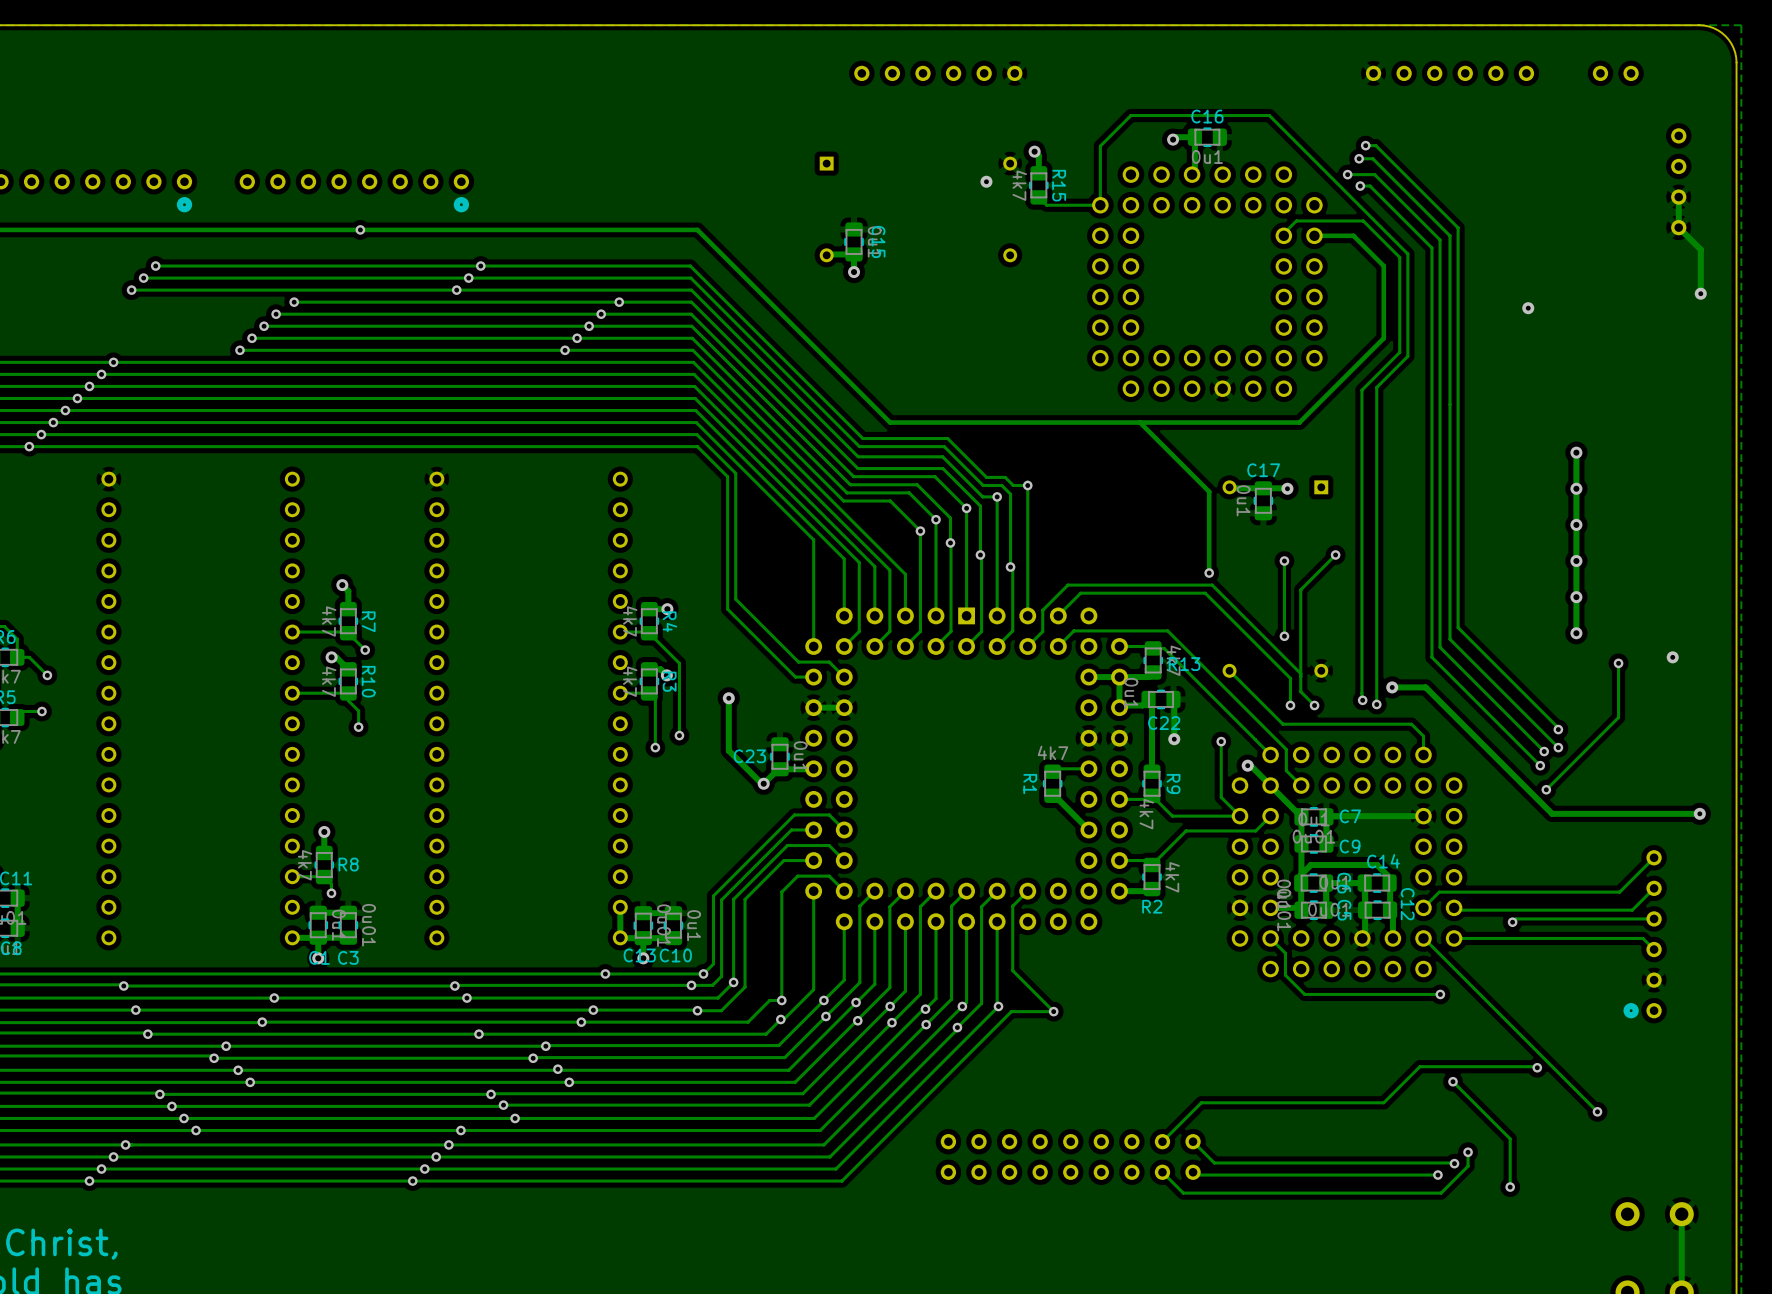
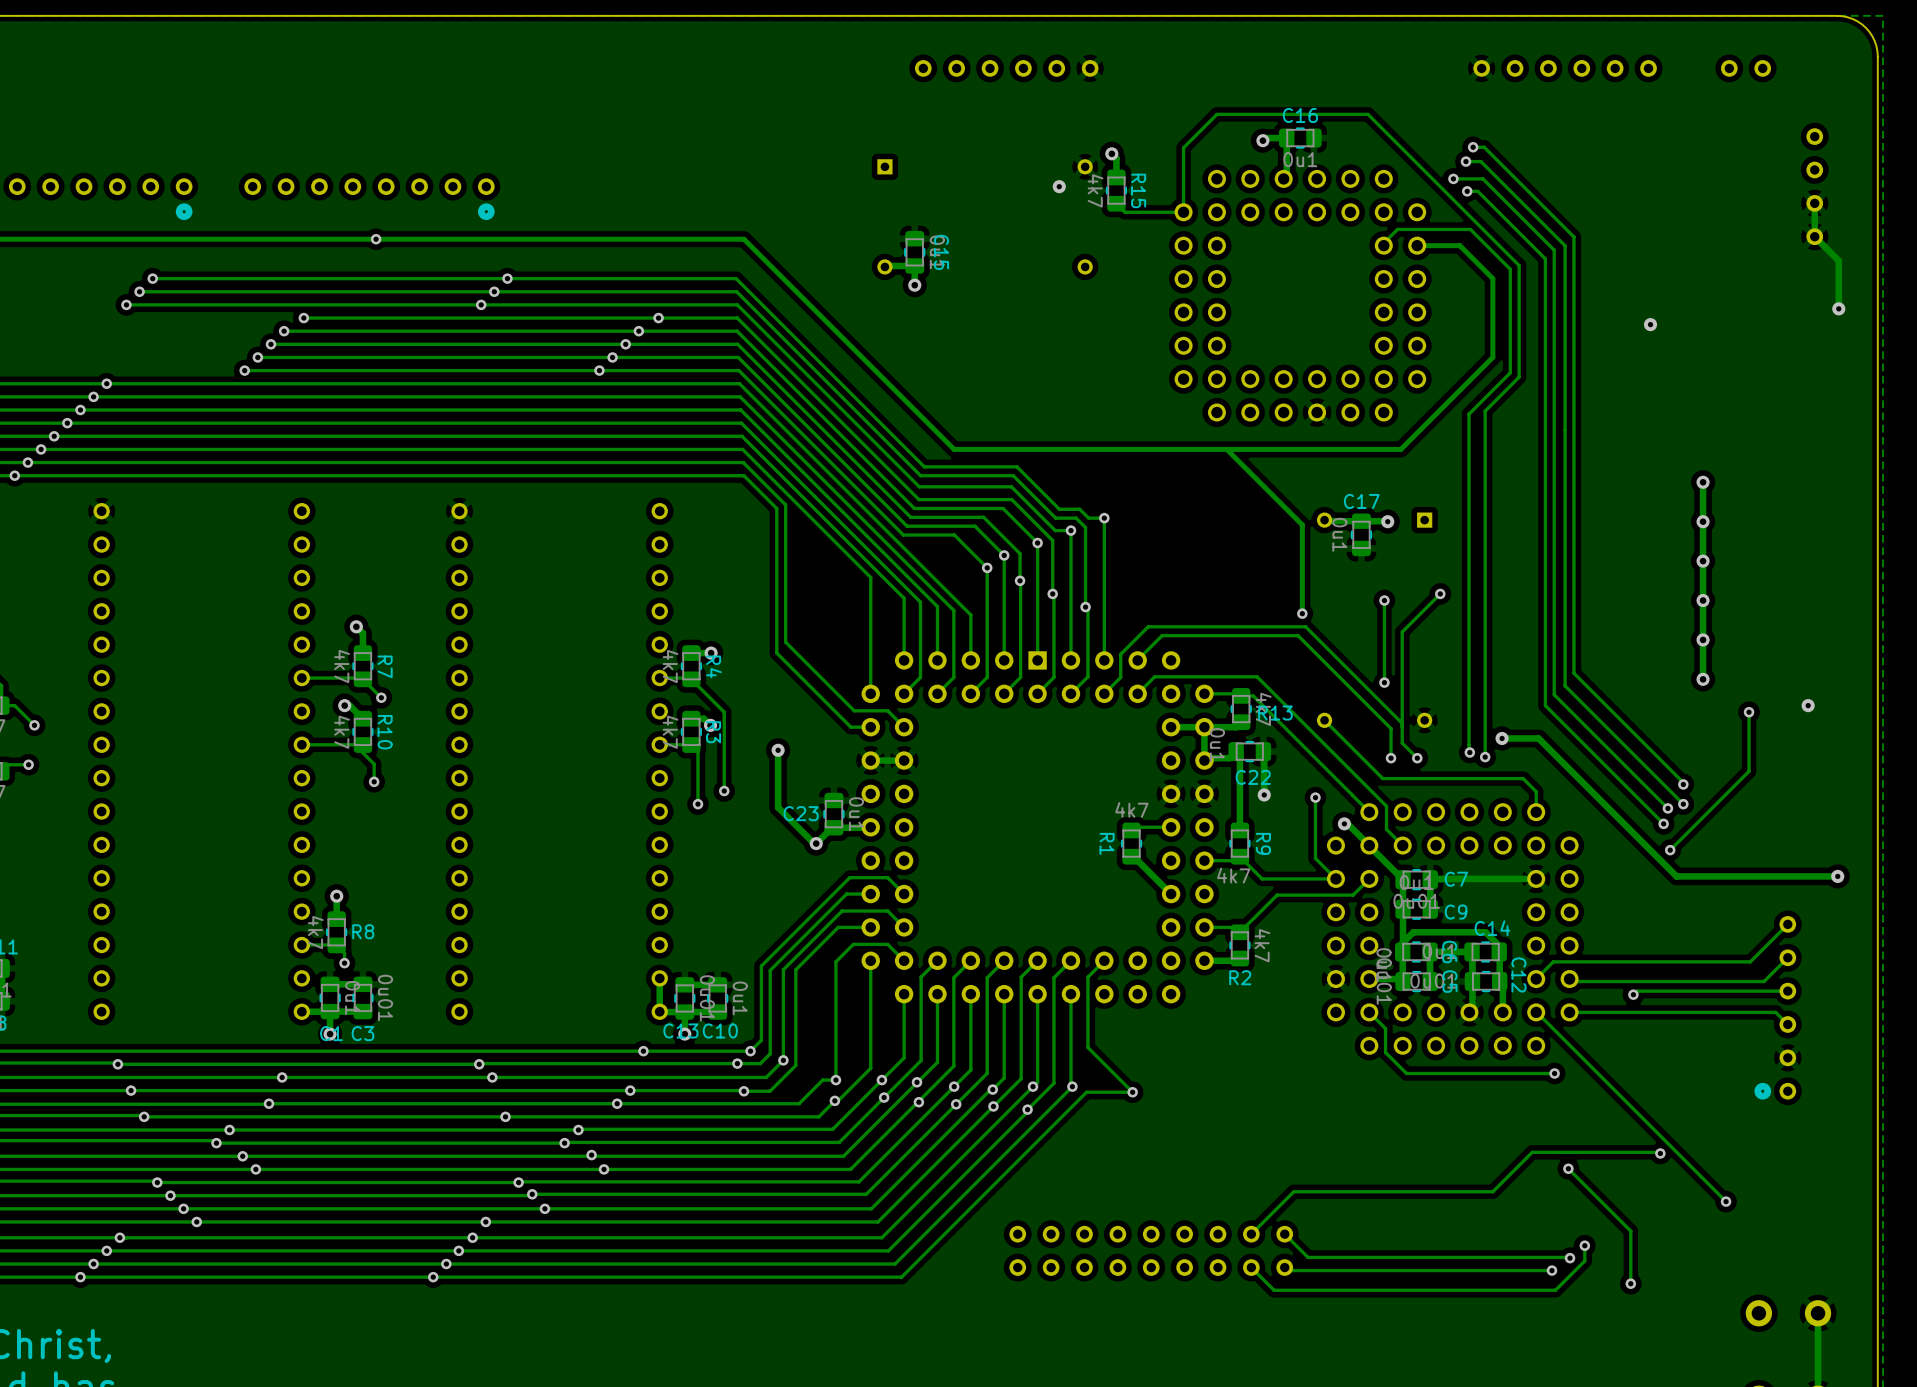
R9 value rotation: 0° (1146, 814) -> 90° counterclockwise (1233, 875)

